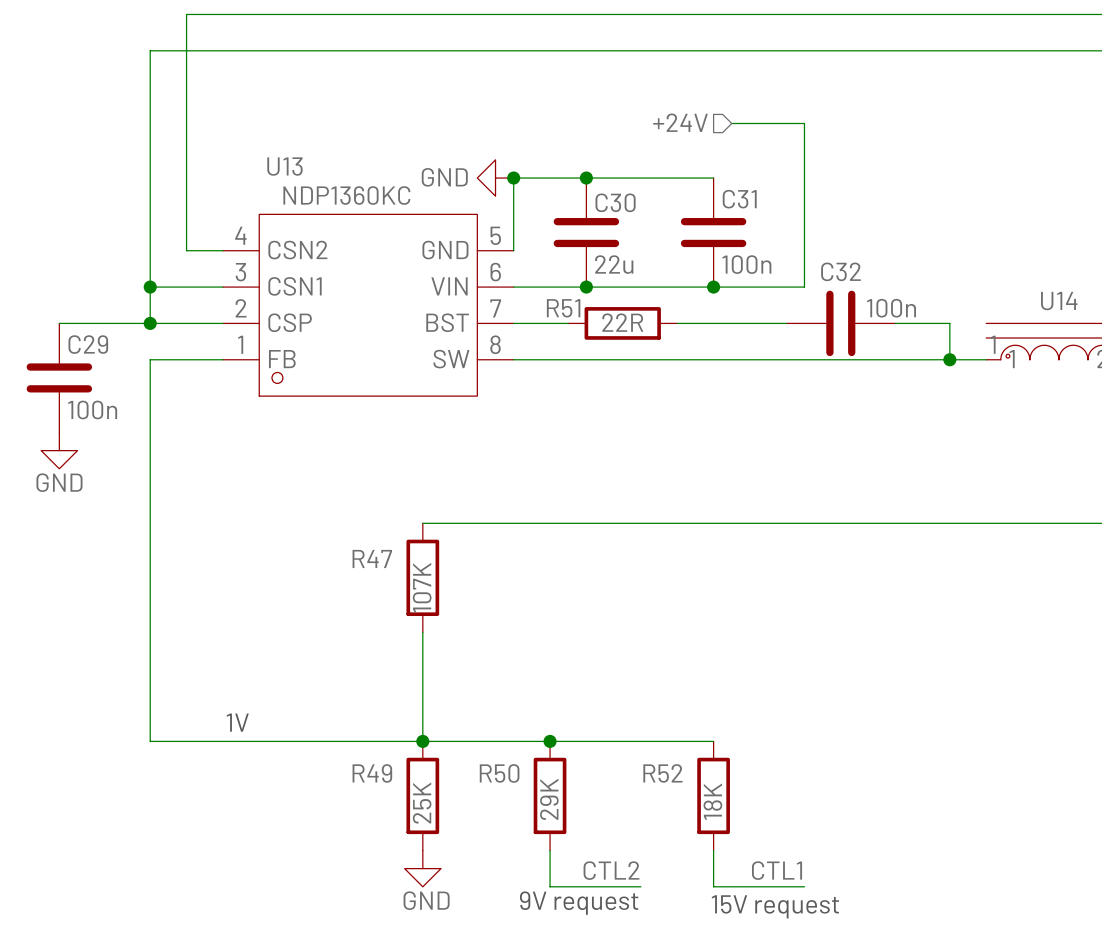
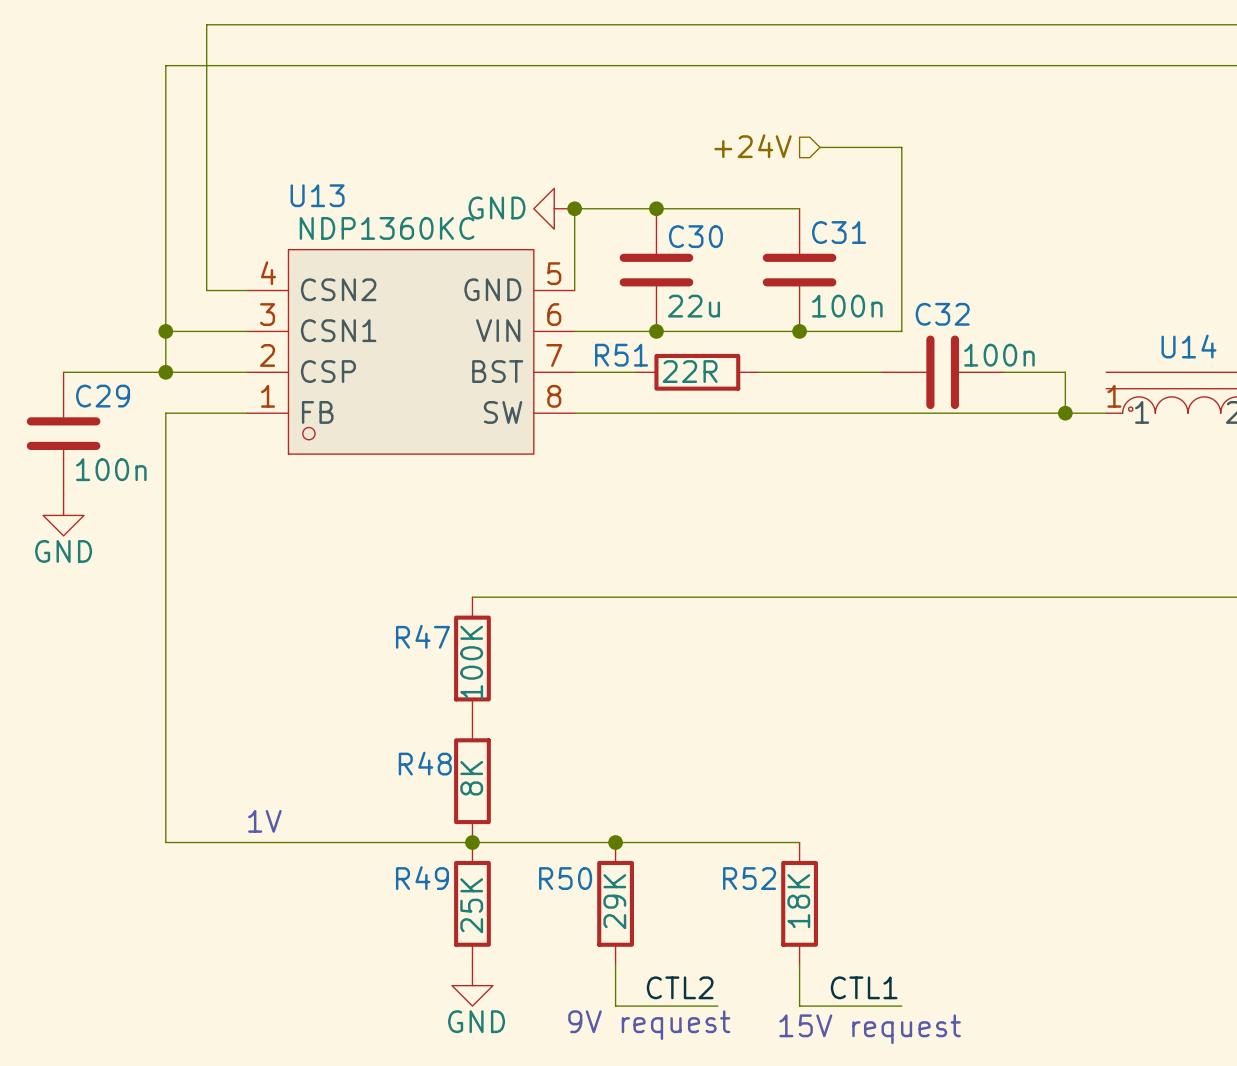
R47 value: 107K (422, 587) -> 100K (471, 662)
wire: (422, 632) (422, 741) -> none
R48: none -> 8K (472, 781)

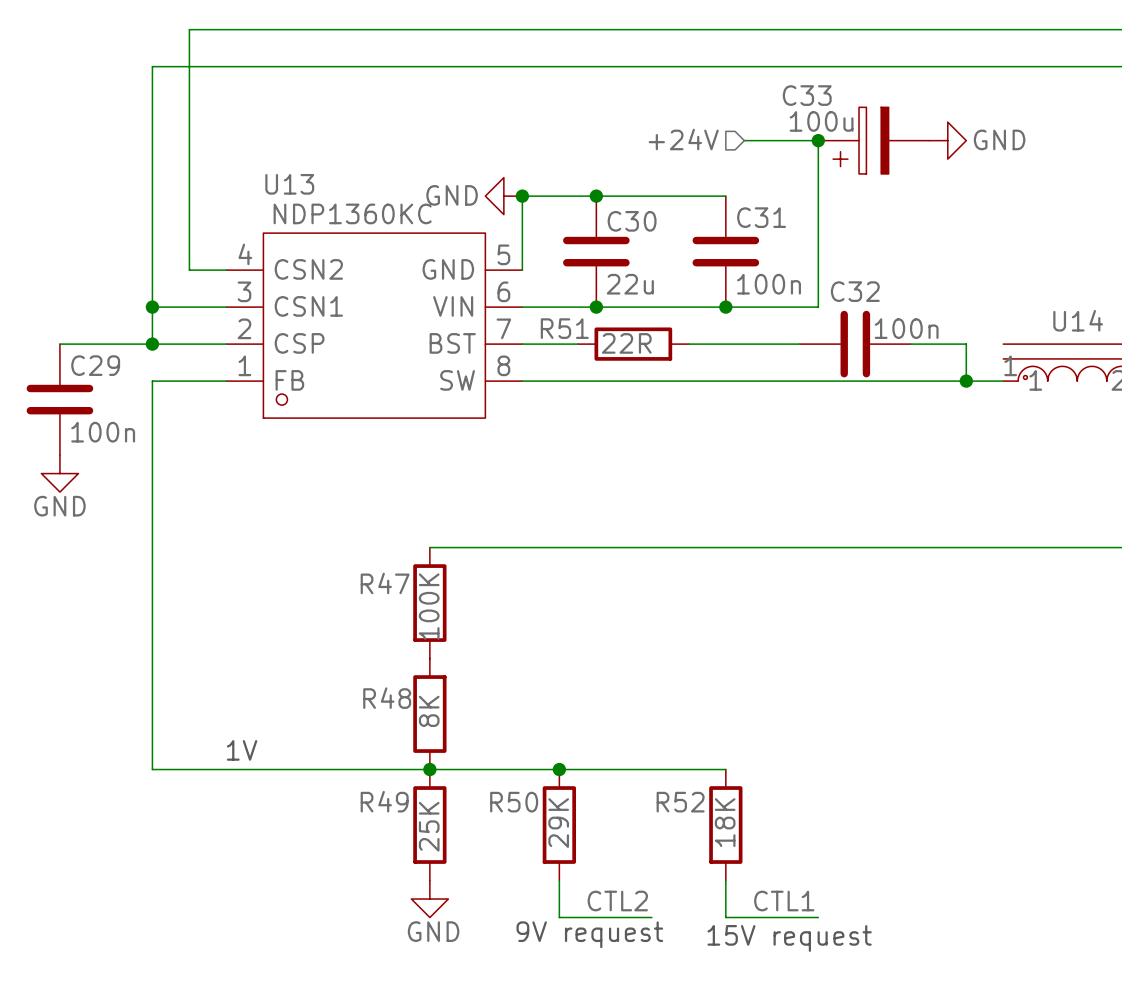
junction: none -> (818, 140)
C33: none -> 100u (873, 140)
power symbol: none -> GND (947, 140)

